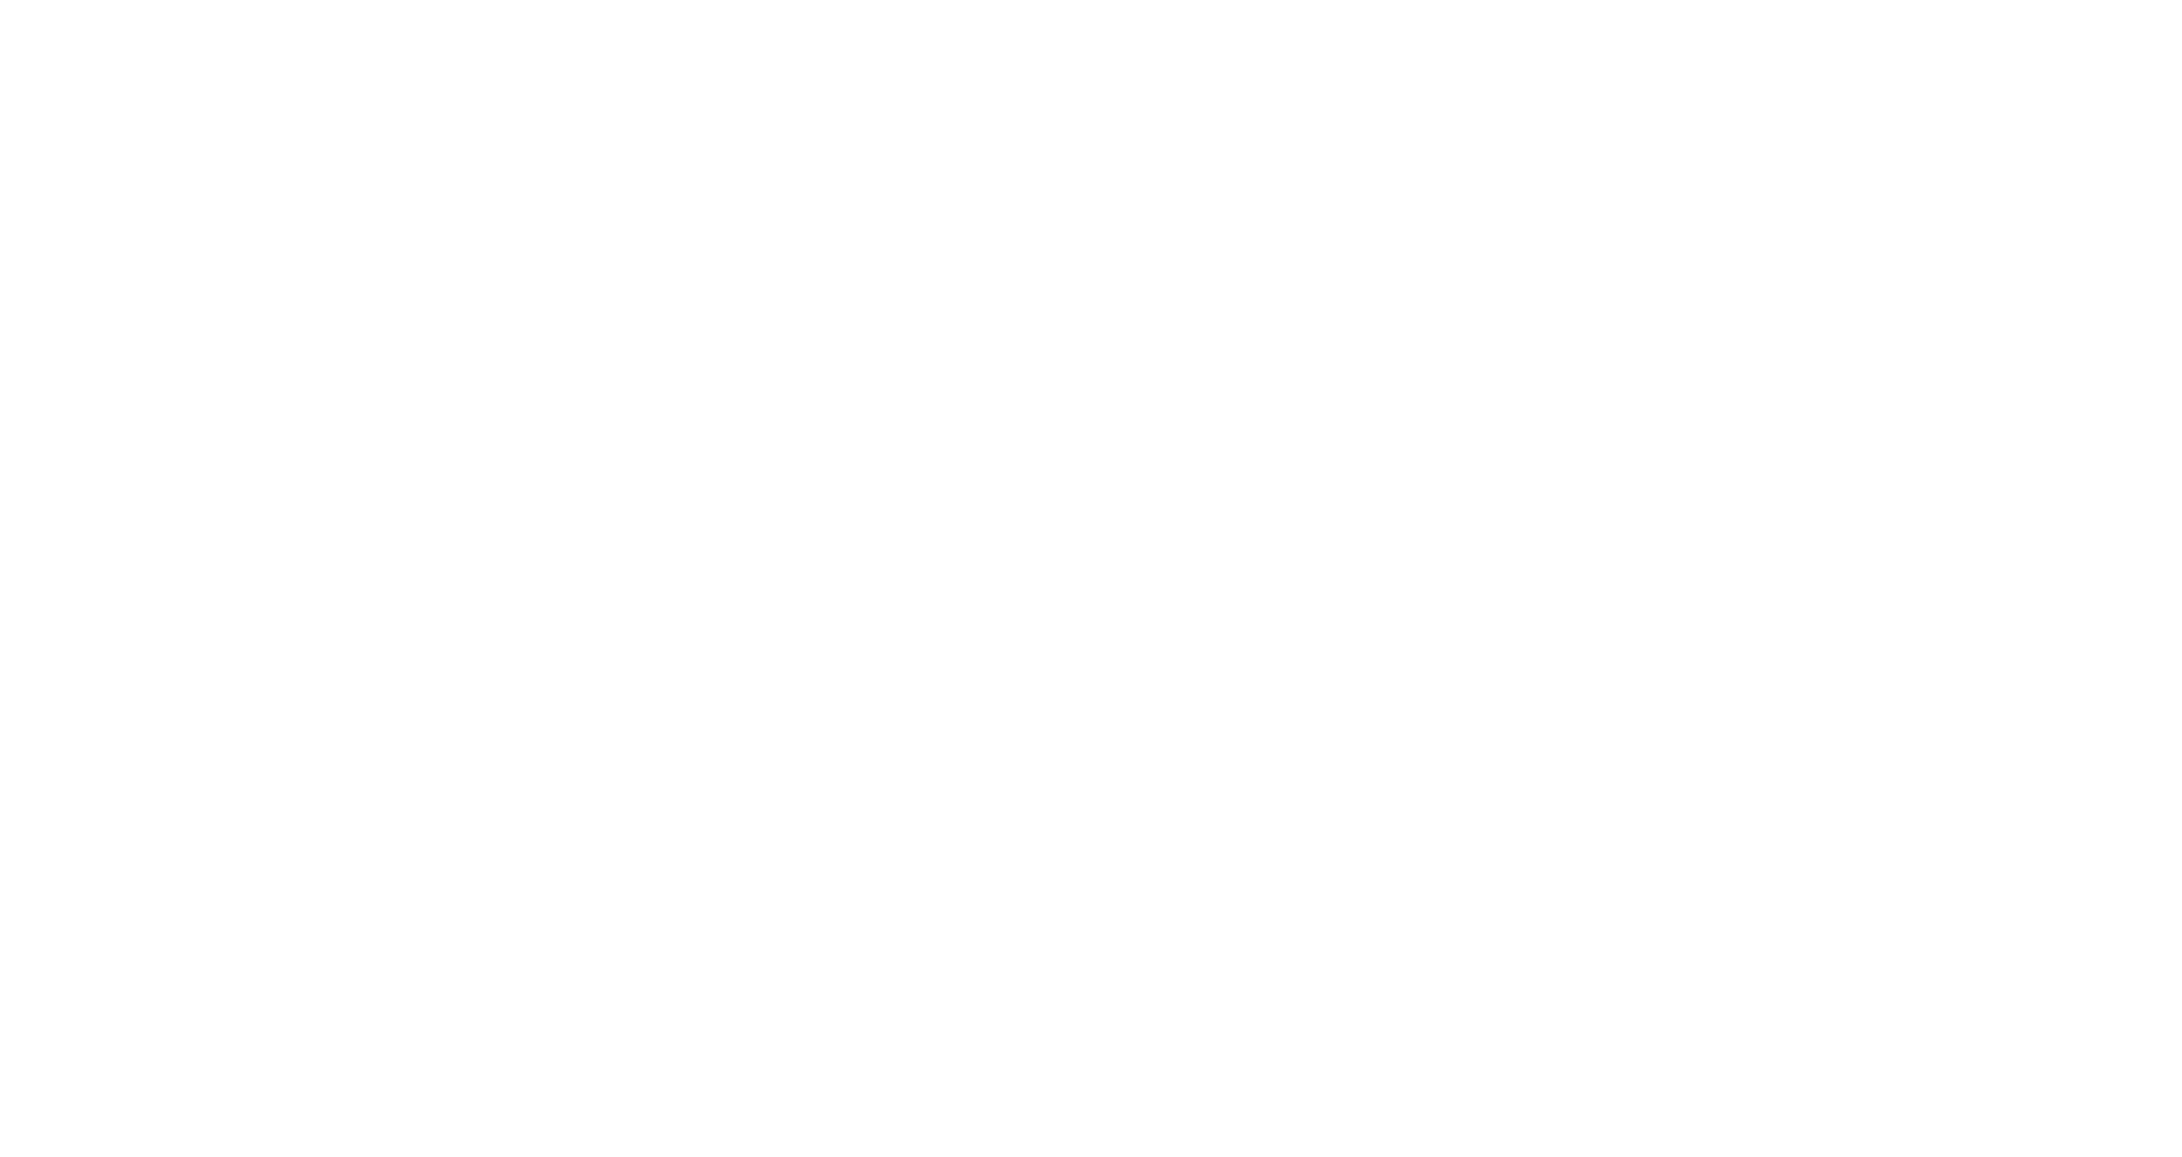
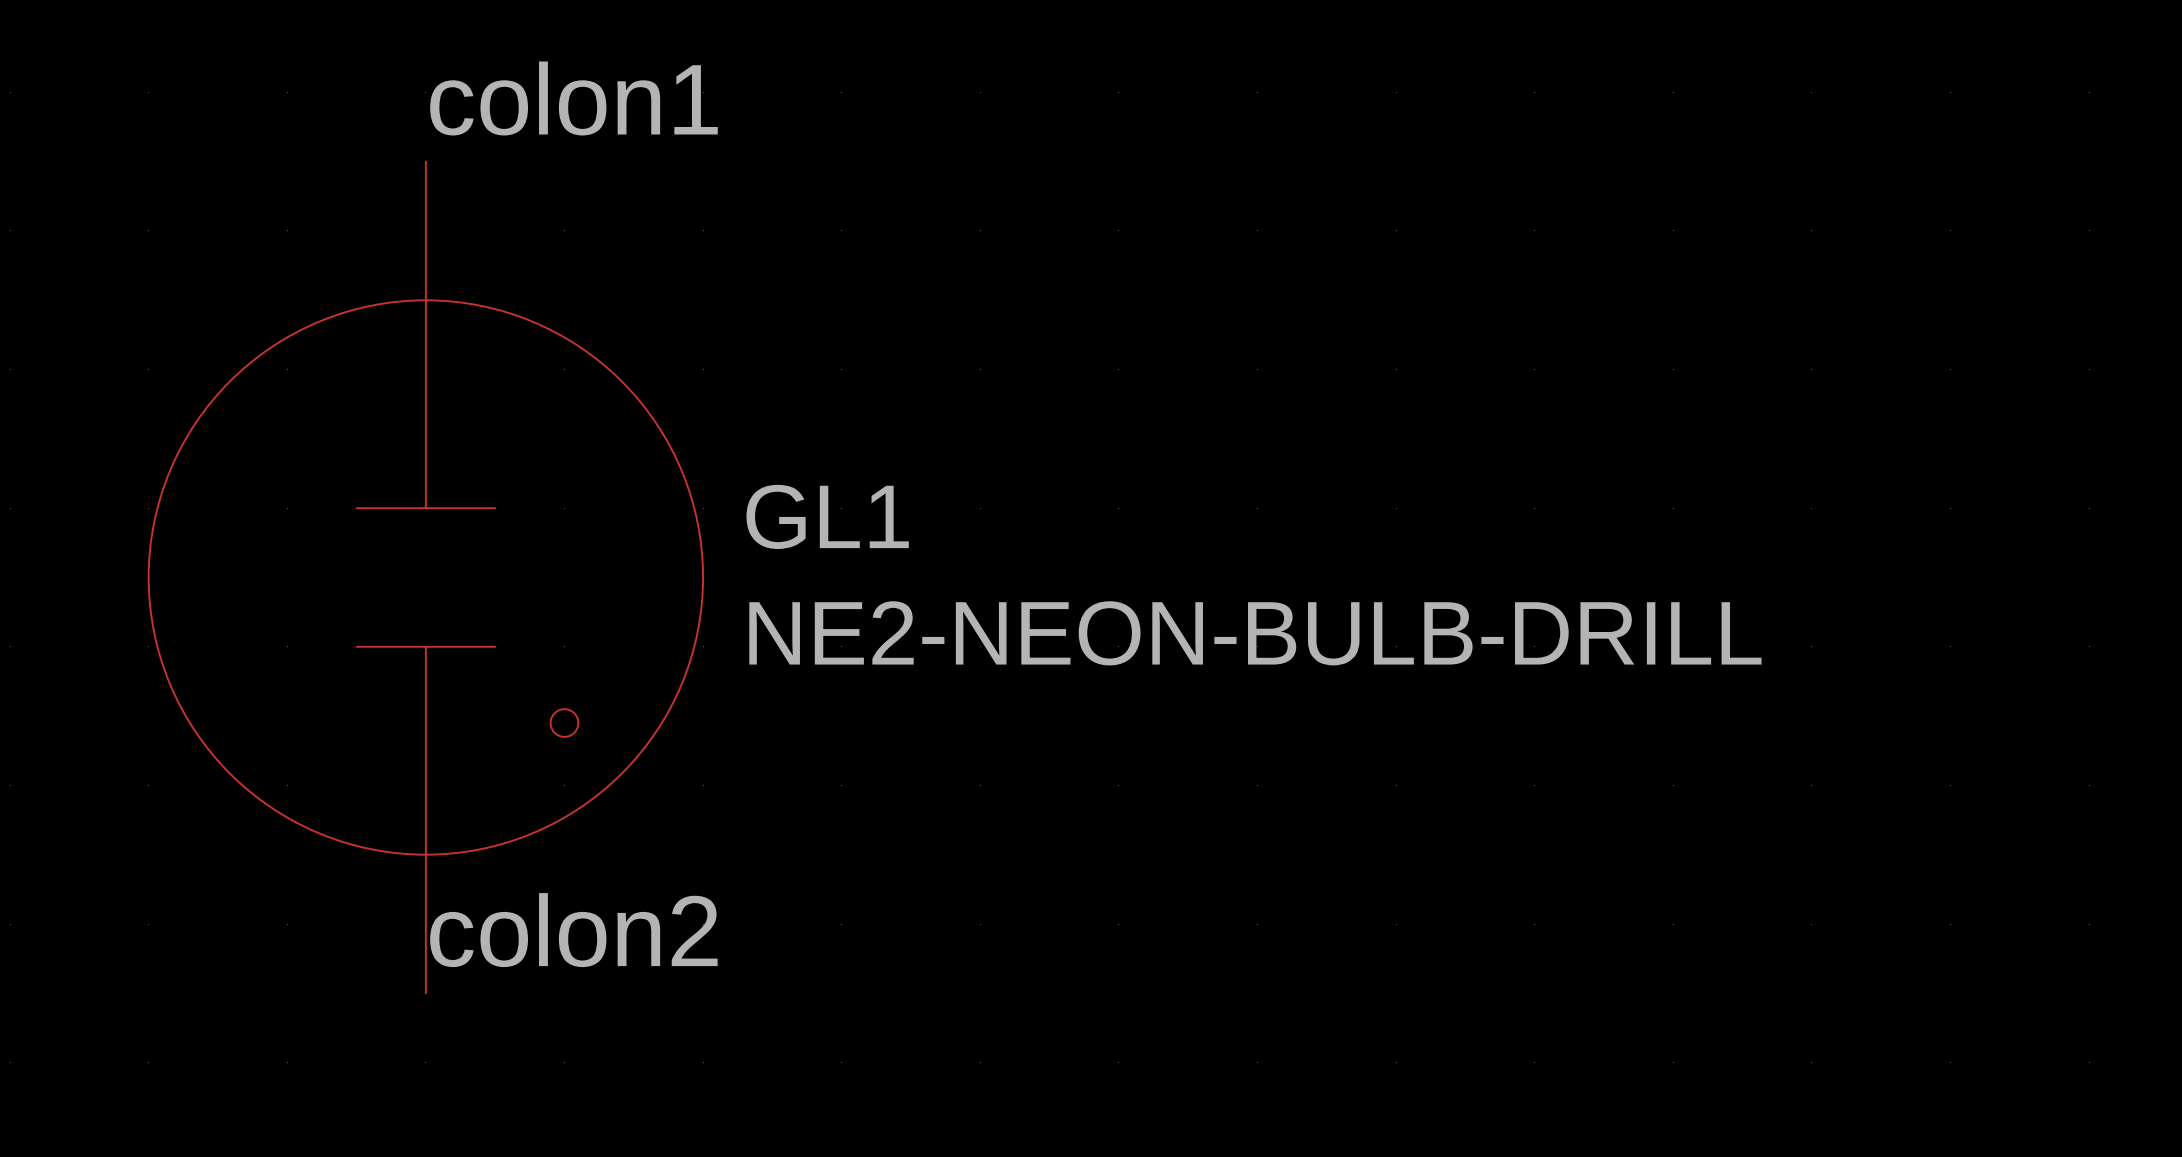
label: none -> colon1 (573, 98)
GL1: none -> NE2-NEON-BULB-DRILL (425, 577)
label: none -> colon2 (573, 930)

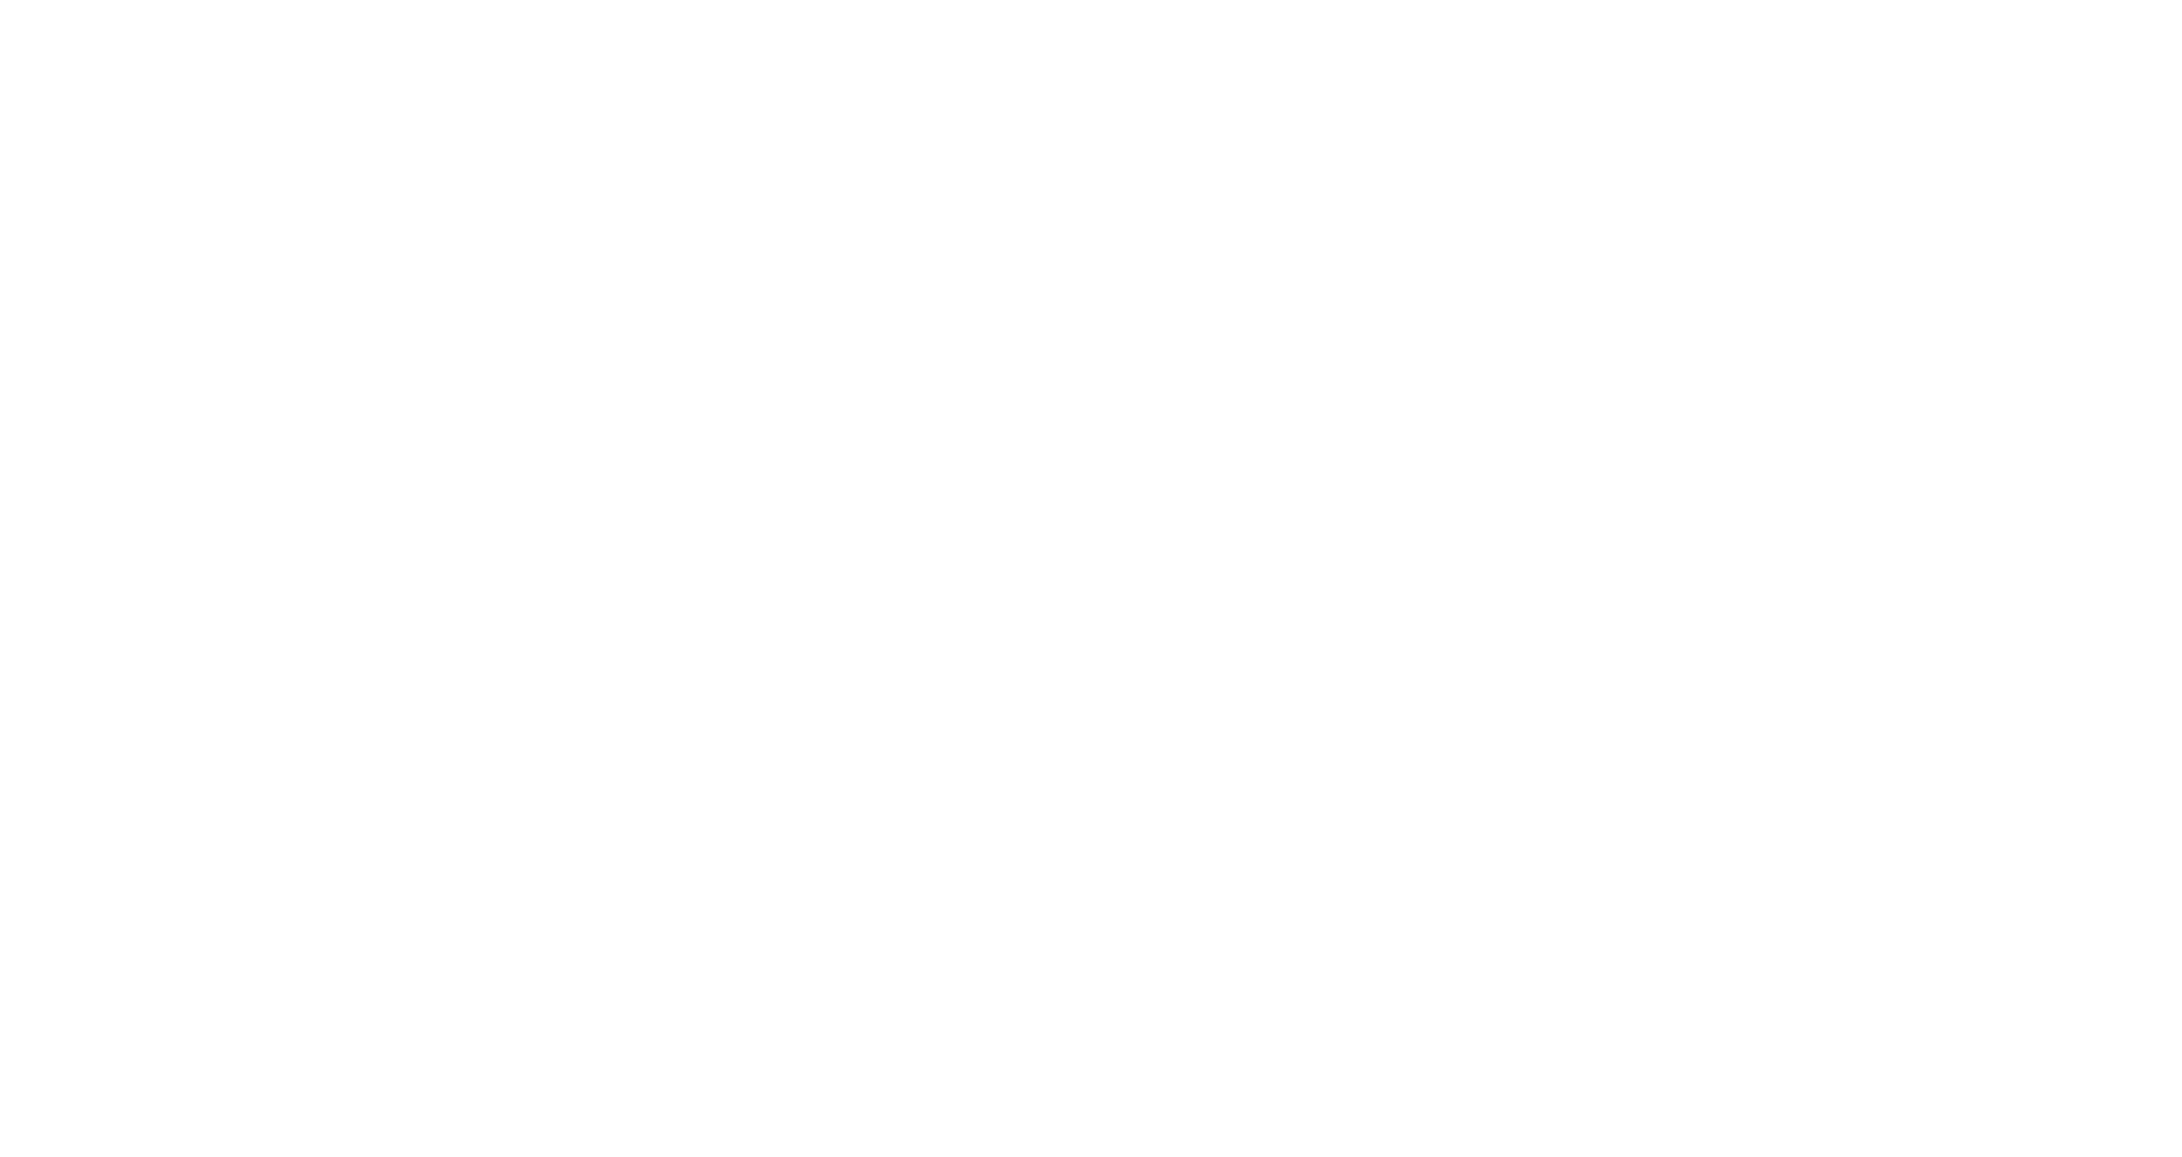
label: colon1 (573, 98) -> none
GL1: NE2-NEON-BULB-DRILL (425, 577) -> none
label: colon2 (573, 930) -> none

